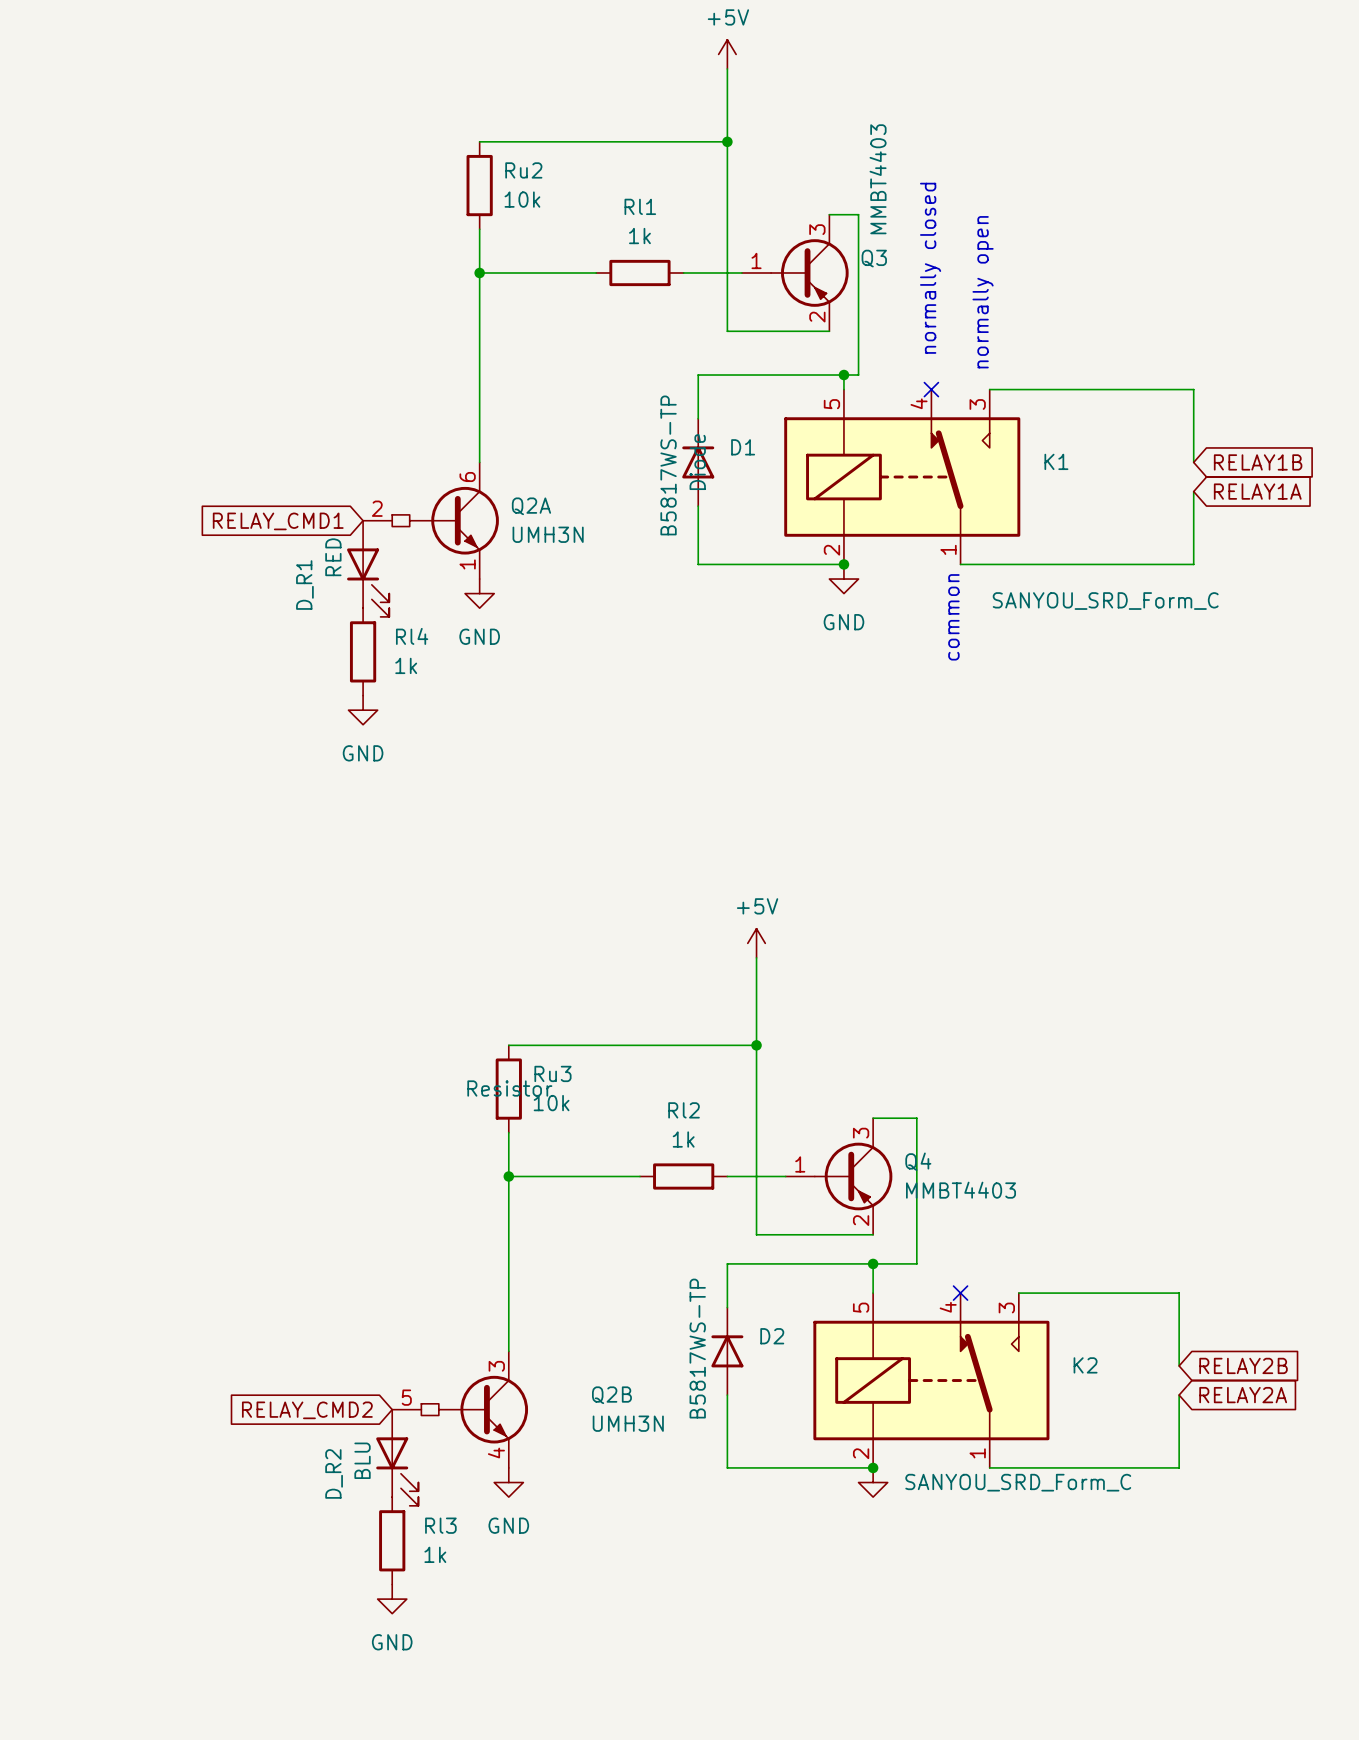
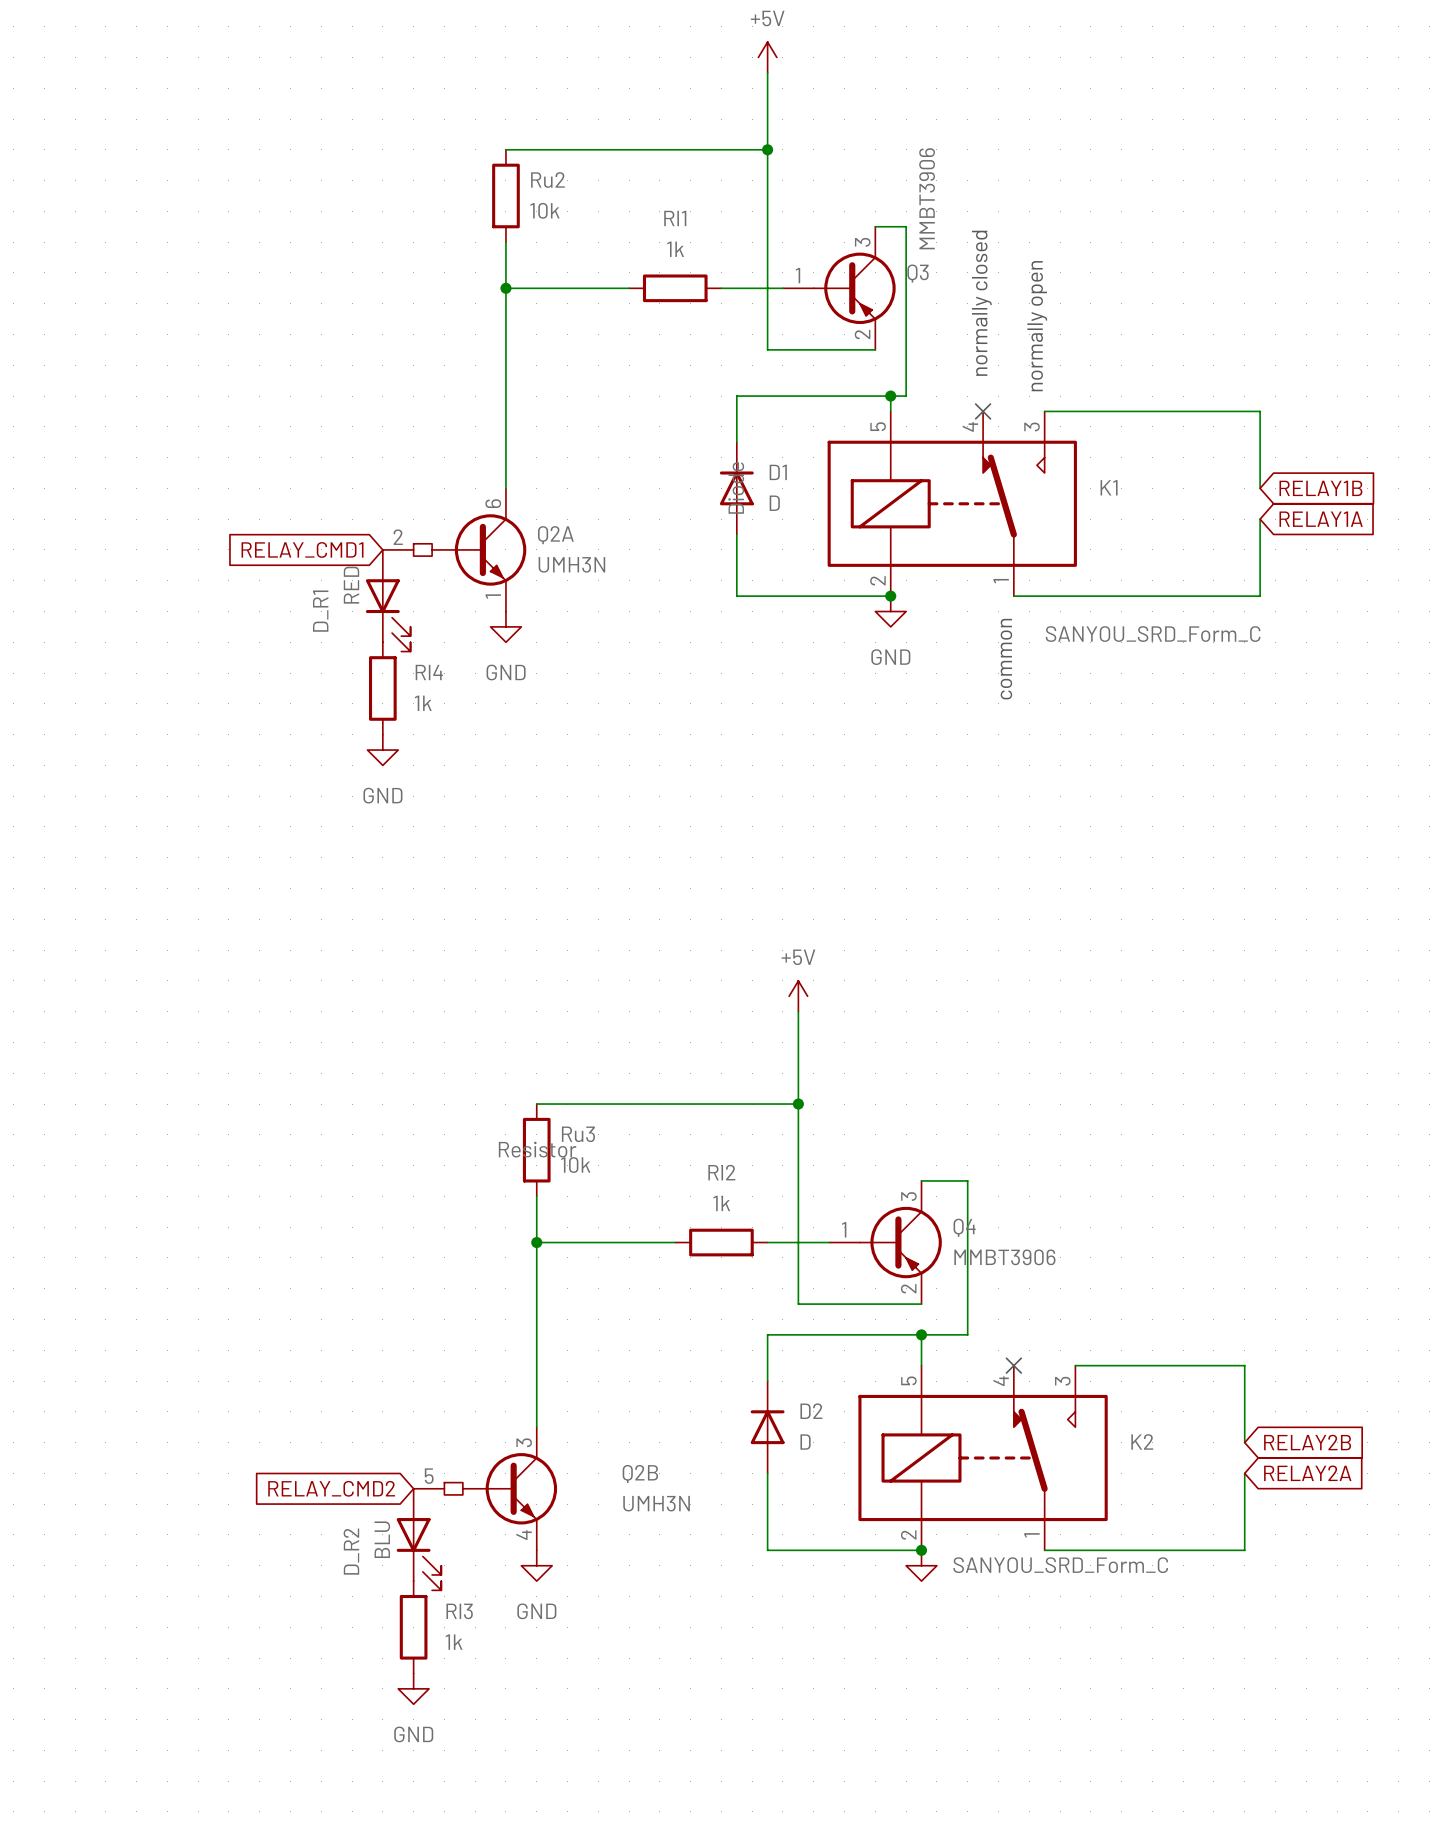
Q3 value: MMBT4403 (878, 179) -> MMBT3906 (927, 198)
D1 value: B5817WS-TP (668, 465) -> D (774, 503)
Q4 value: MMBT4403 (961, 1190) -> MMBT3906 (1004, 1257)
D2 value: B5817WS-TP (697, 1348) -> D (805, 1442)

